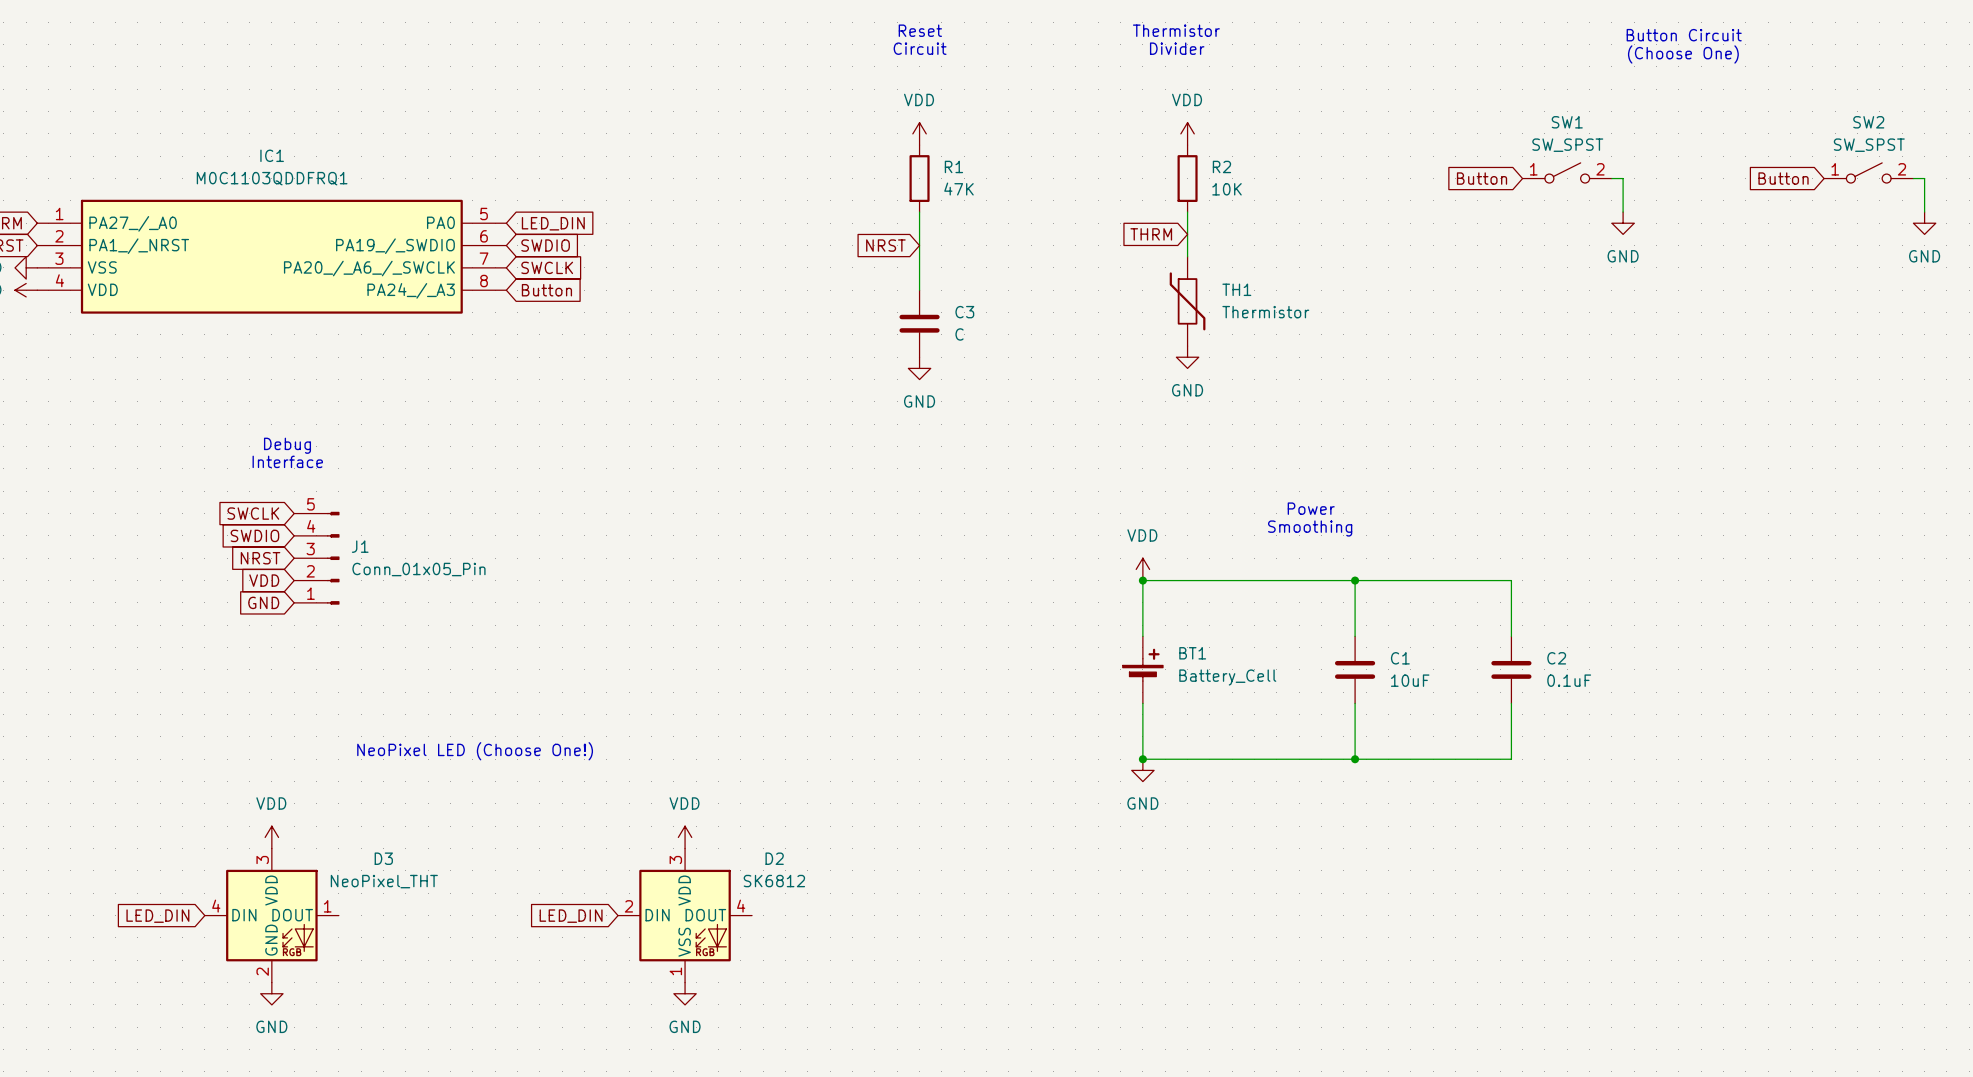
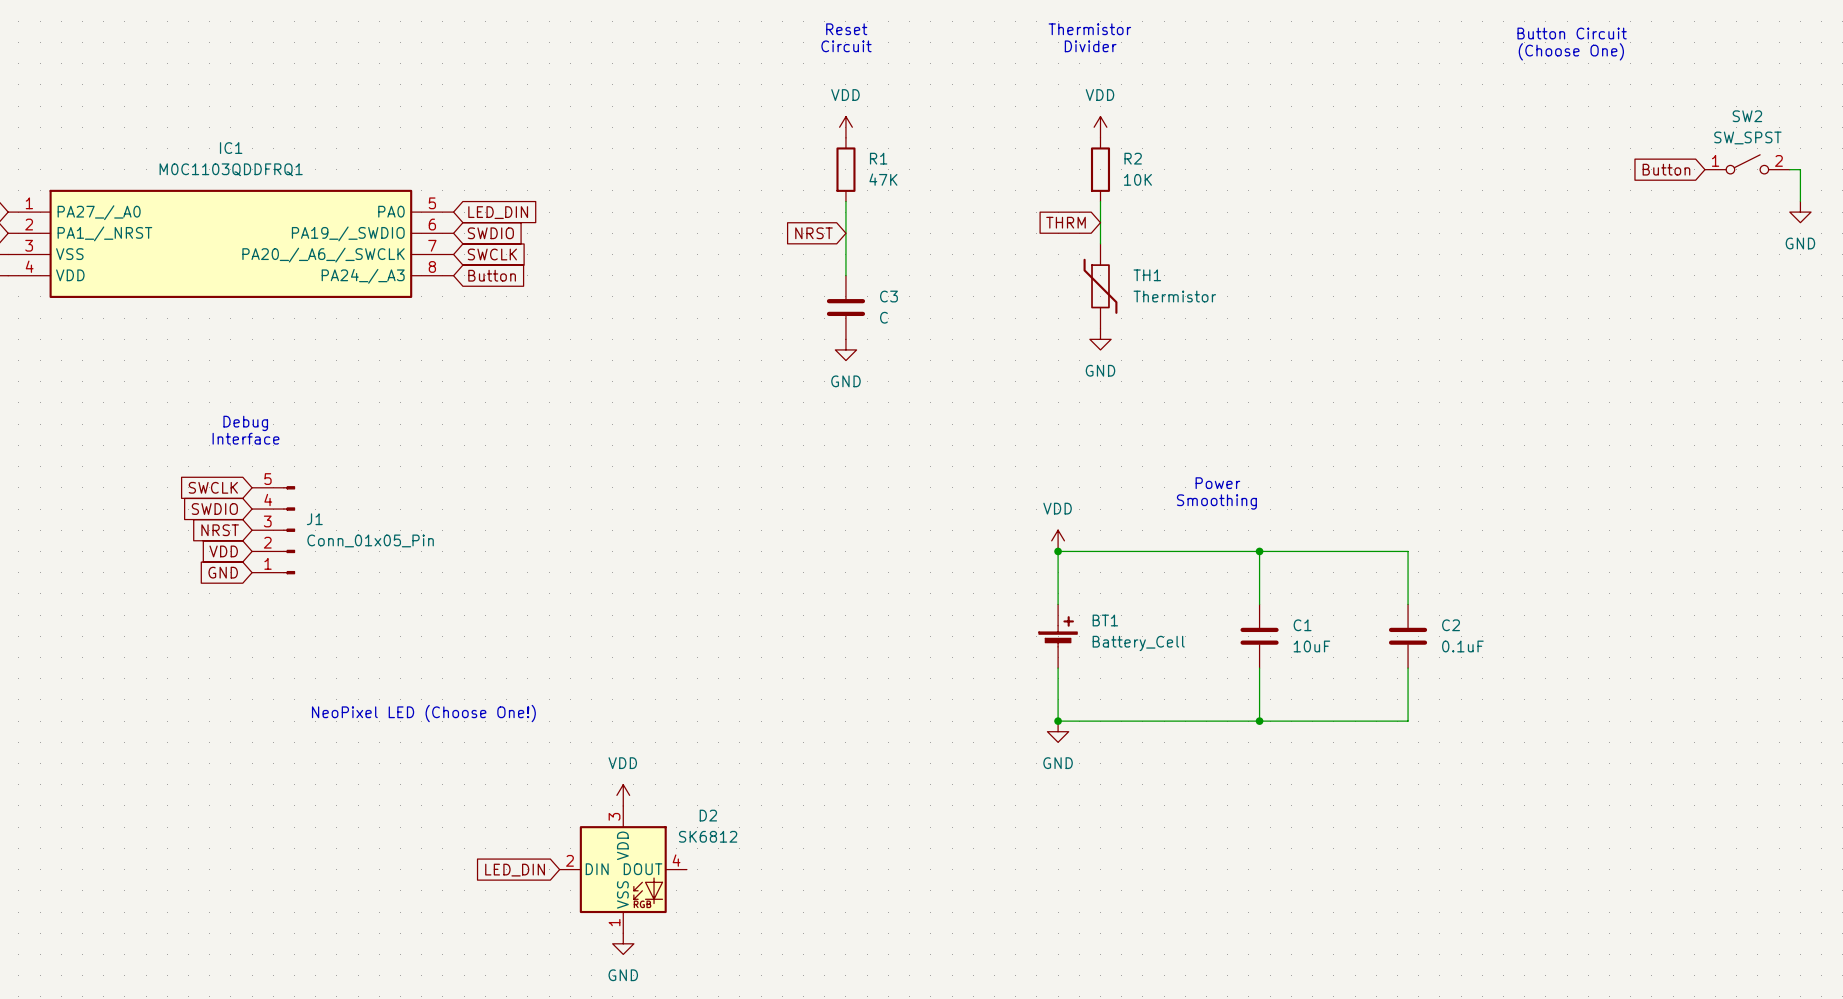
SW1: SW_SPST (1567, 172) -> none
global label: Button (1482, 178) -> none
wire: (1611, 178) (1623, 178) (1623, 212) -> none
power symbol: GND (1623, 223) -> none
power symbol: VDD (271, 837) -> none
D3: NeoPixel_THT (271, 915) -> none
global label: LED_DIN (157, 916) -> none
power symbol: GND (271, 993) -> none

